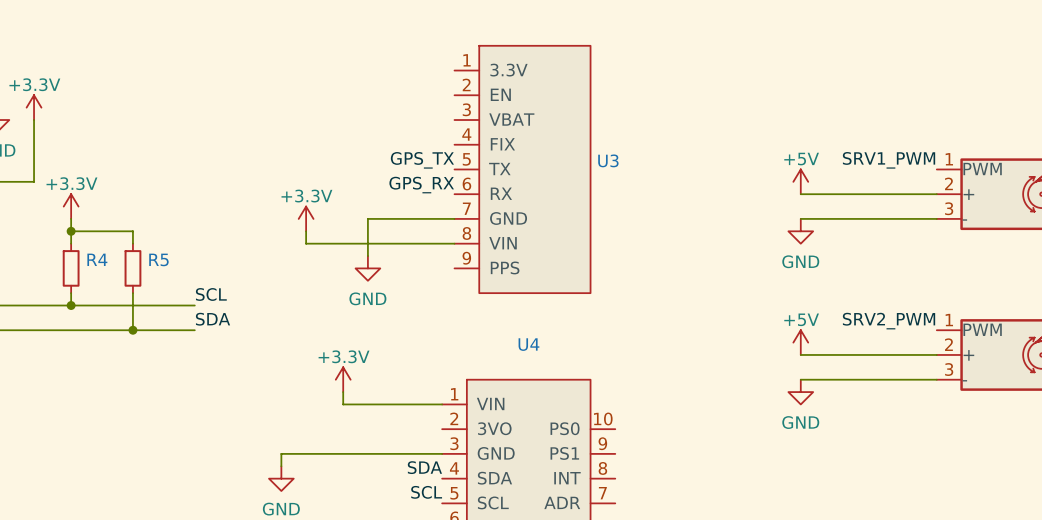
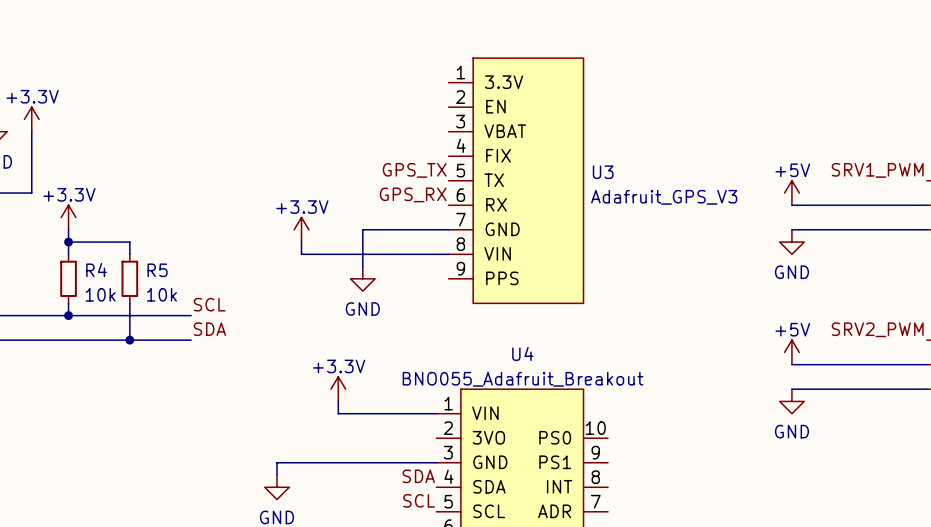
U3 value: none -> Adafruit_GPS_V3 (664, 197)
R4 value: none -> 10k (100, 294)
R5 value: none -> 10k (161, 294)
U4 value: none -> BNO055_Adafruit_Breakout (523, 379)

